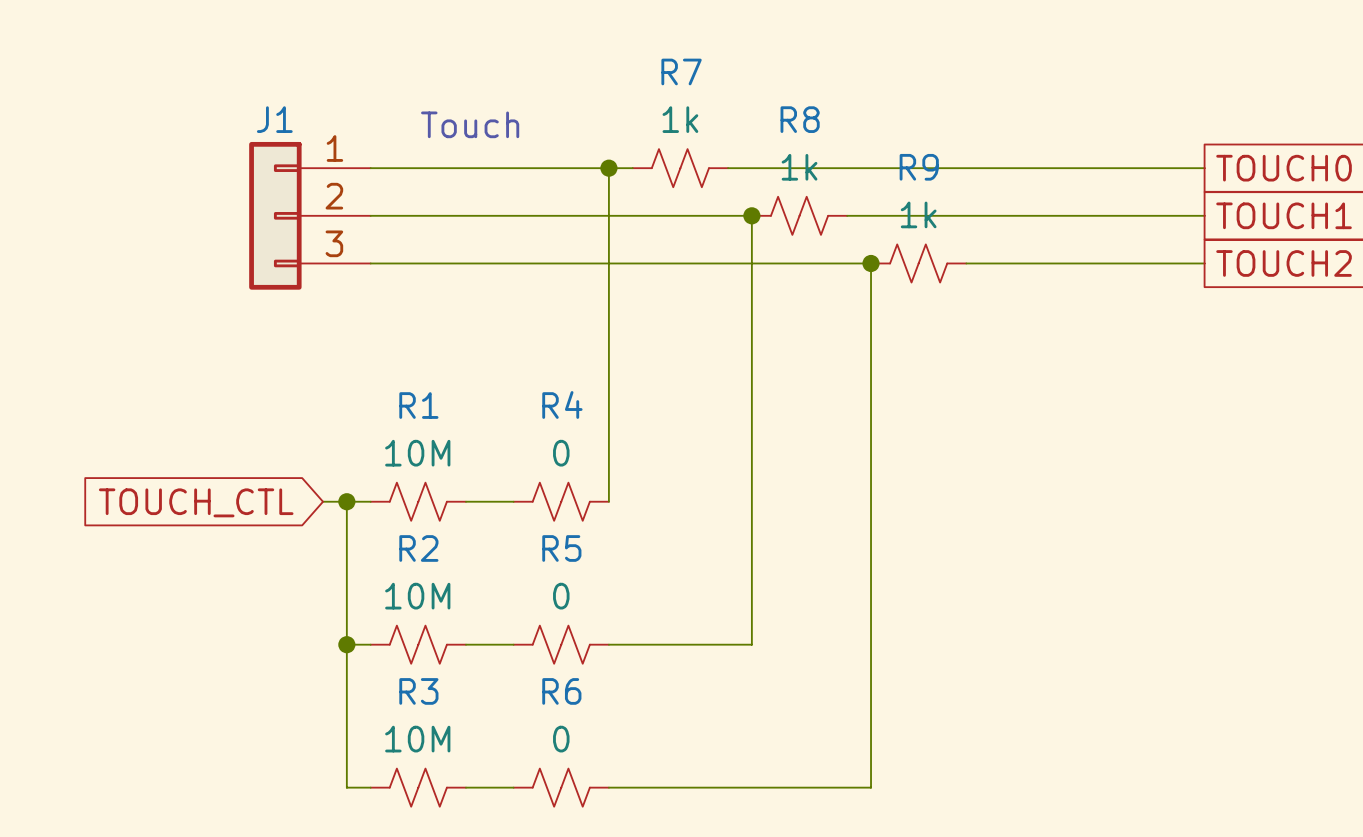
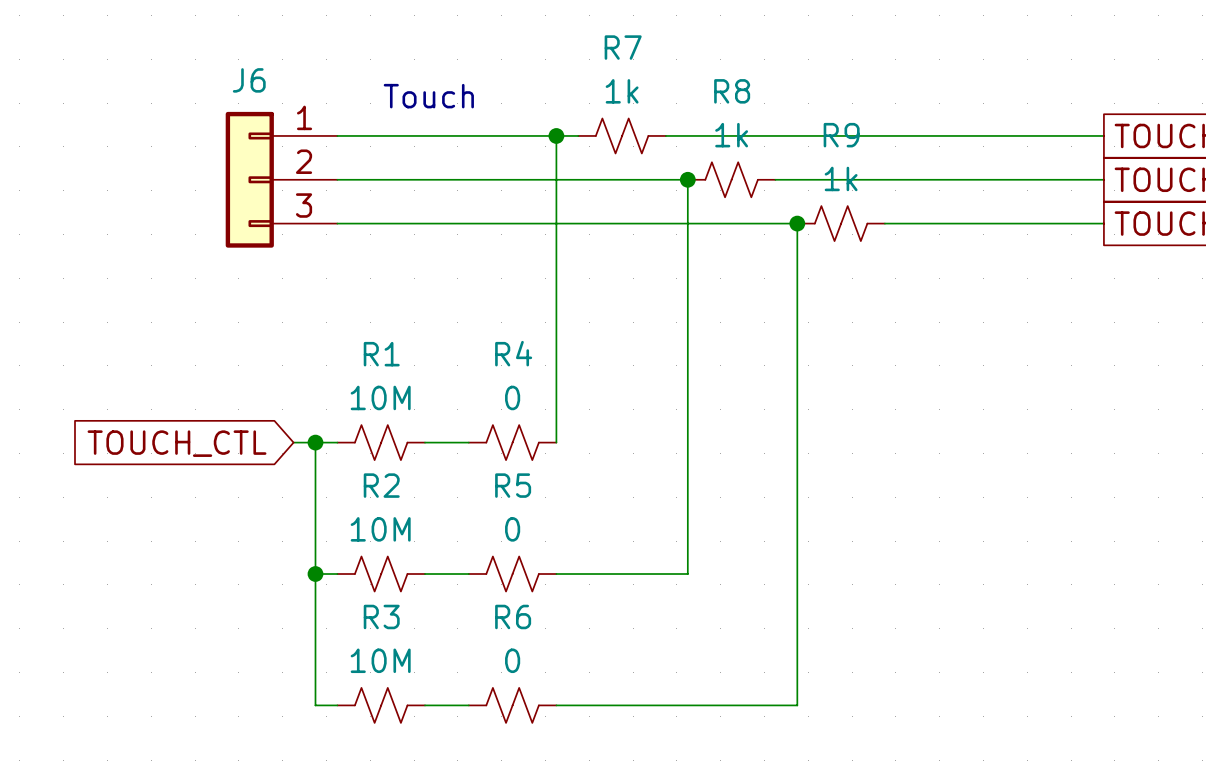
J1 name: J1 (274, 119) -> J6 (249, 80)

